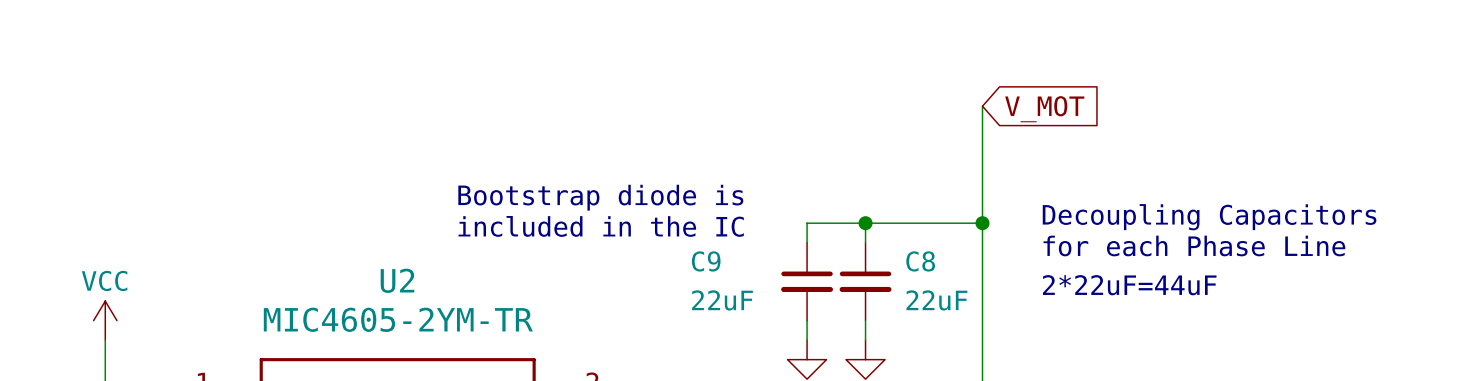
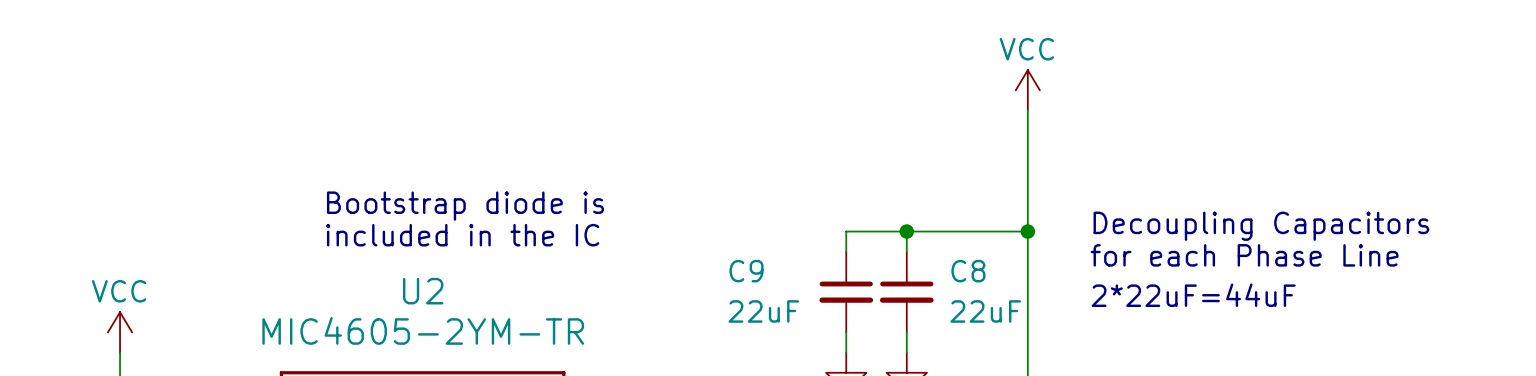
power symbol: none -> VCC (1027, 90)
global label: V_MOT (1044, 109) -> none
text position: Bootstrap diode is (600, 197) -> Bootstrap diode is (465, 206)
text position: included in the IC (601, 226) -> included in the IC (462, 235)

